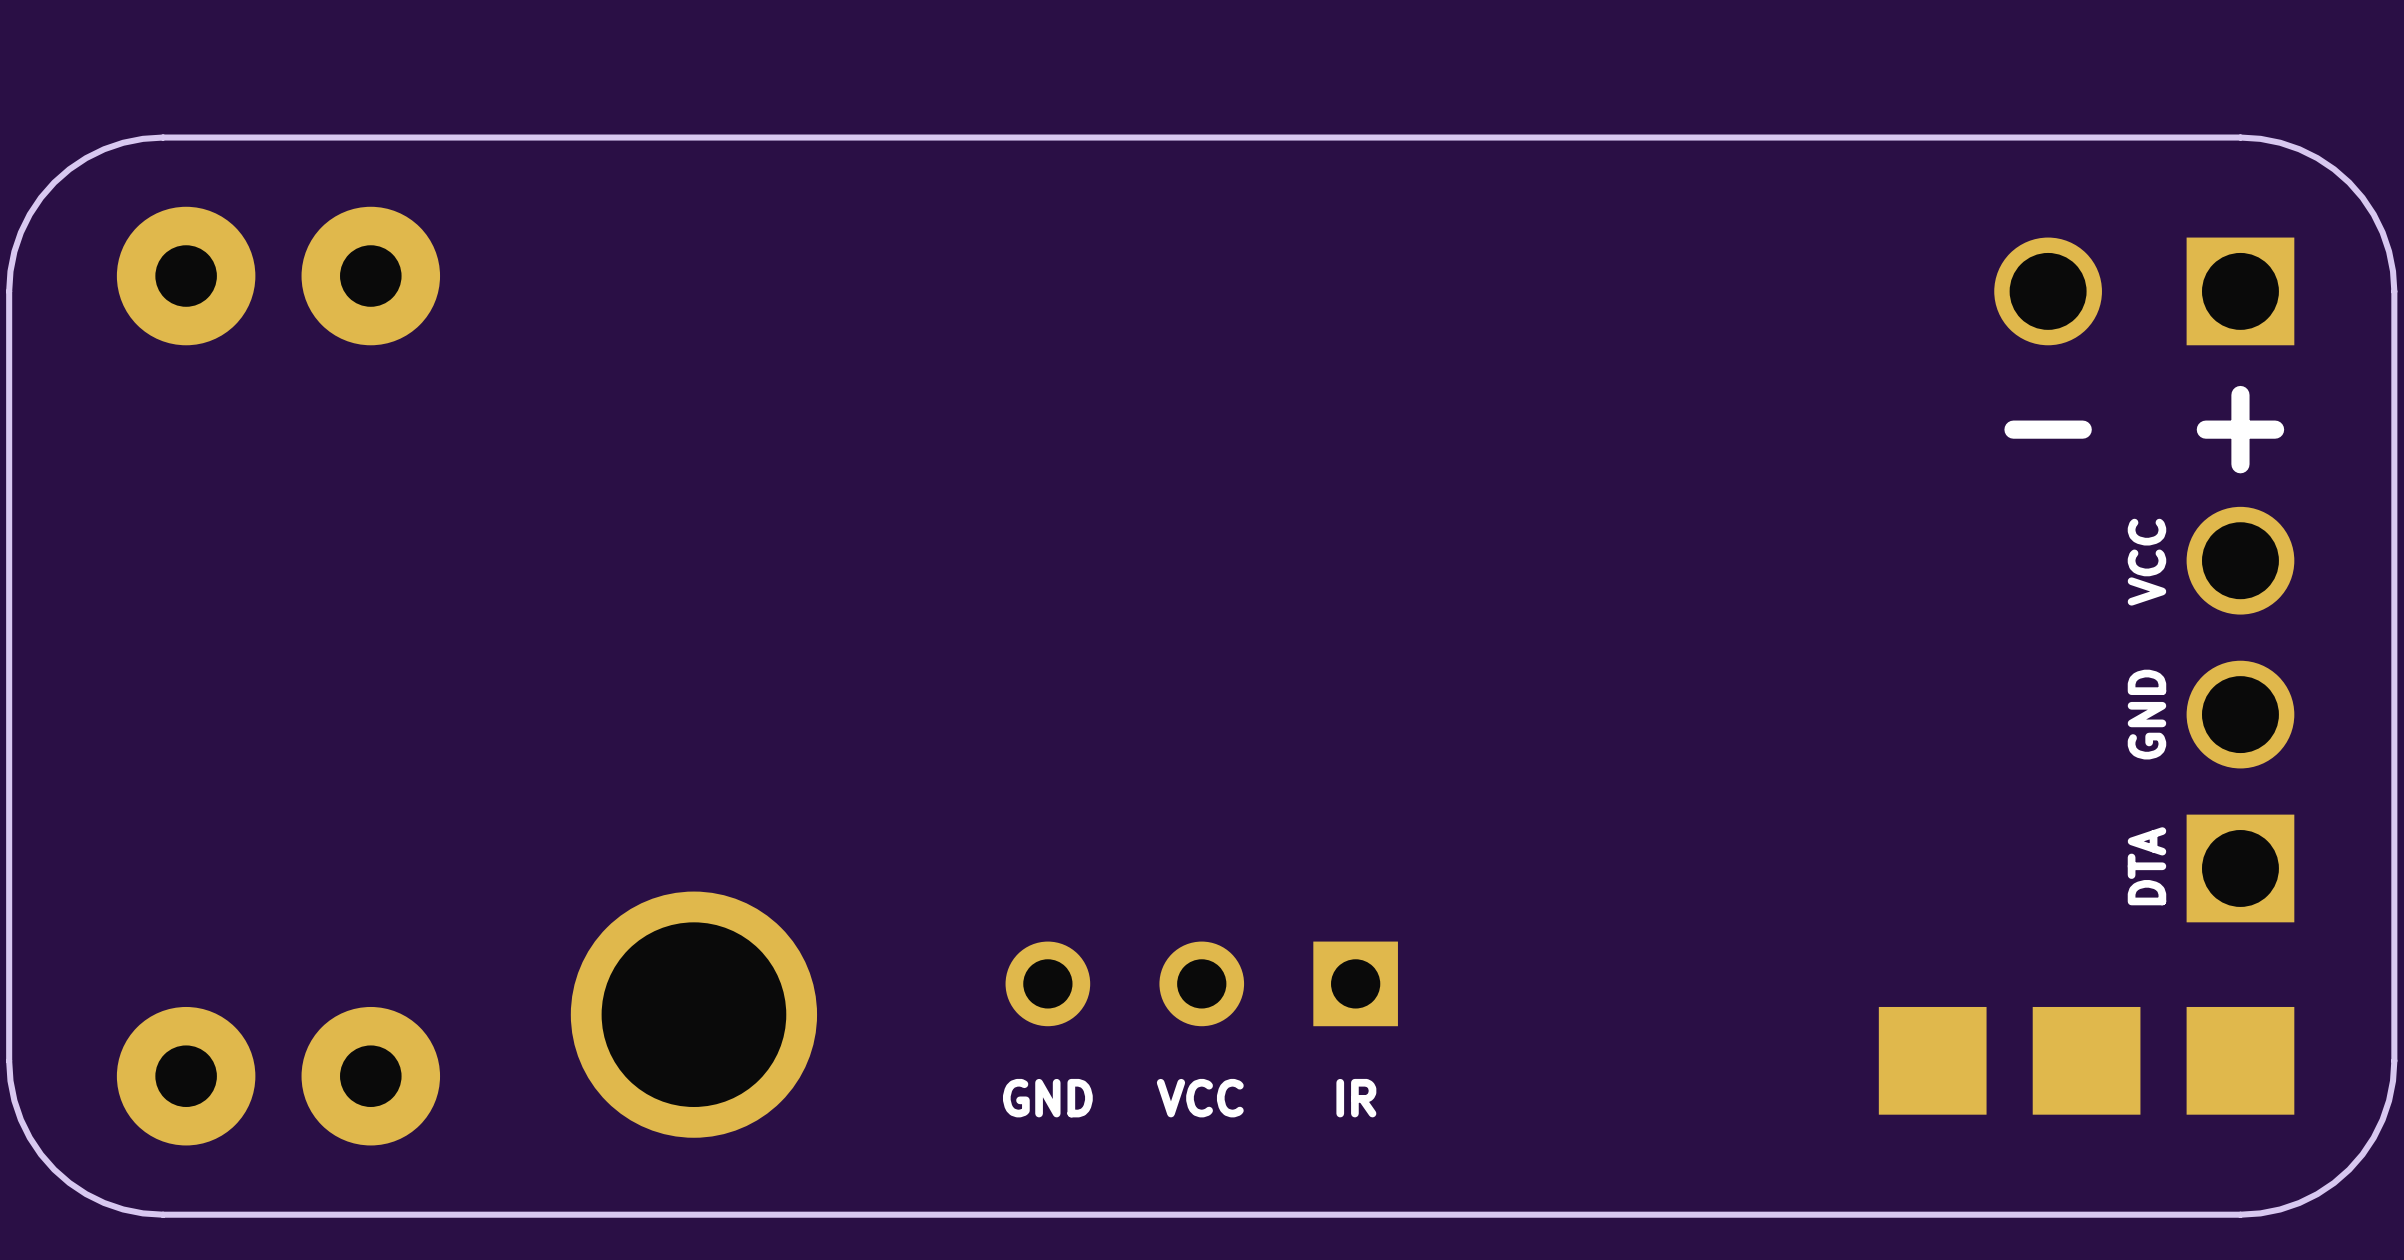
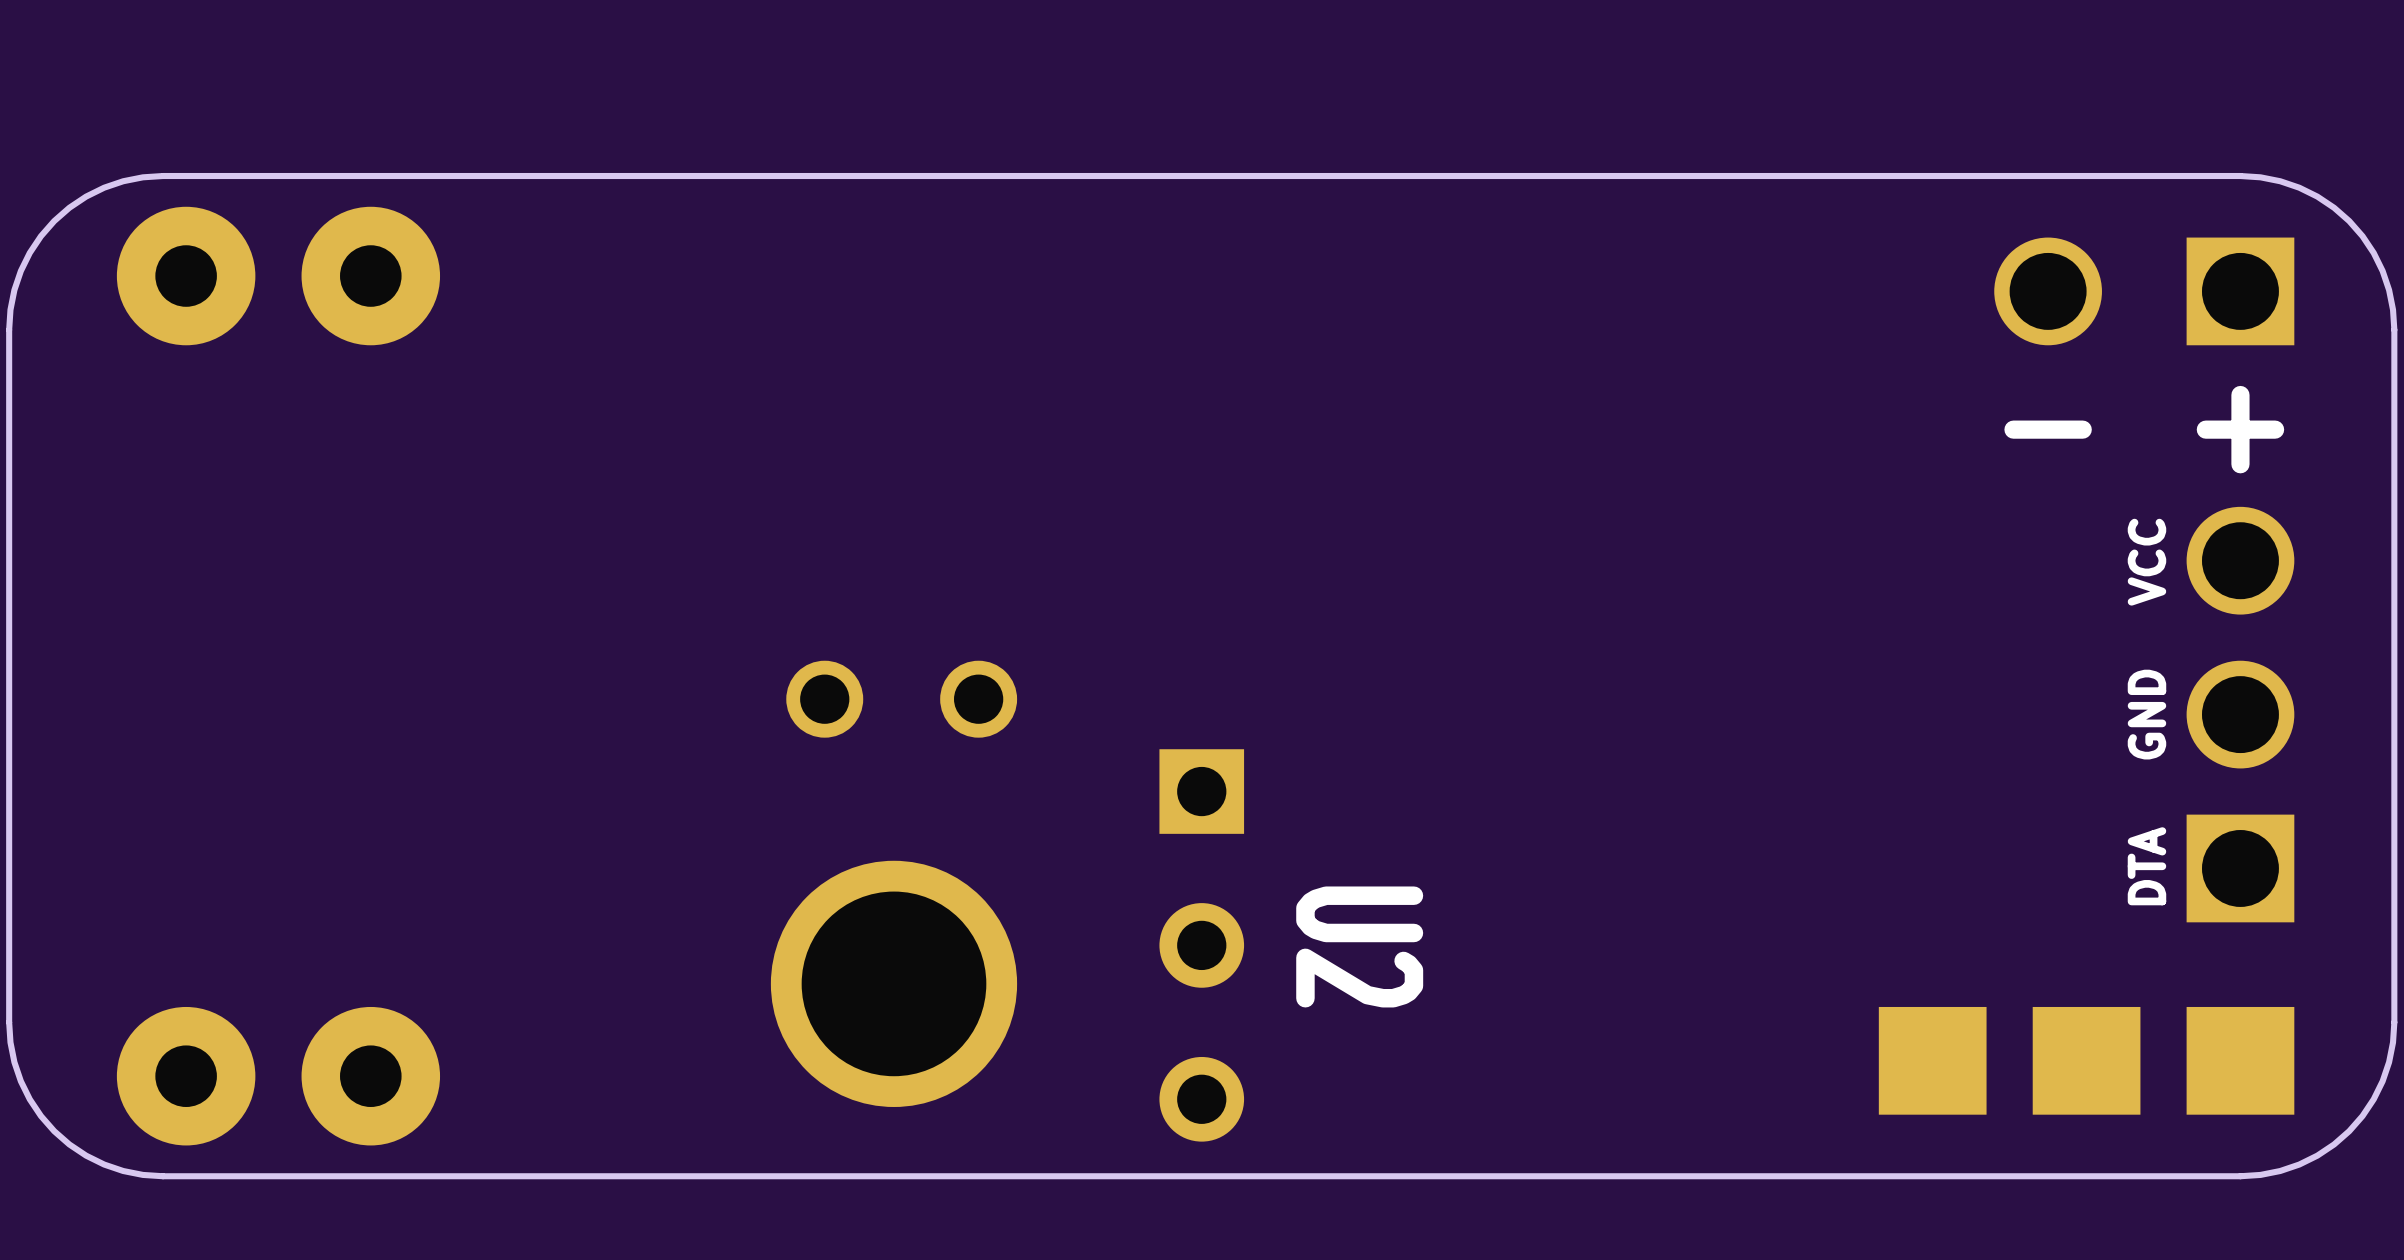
board edge: (2394, 329) (2393, 271) (2389, 251) (2373, 214) (2362, 197) (2349, 182) (2317, 158) (2280, 142) (2240, 137) (142, 138) (104, 149) (86, 158) (69, 169) (40, 197) (29, 214) (14, 251) (10, 271) (9, 329) -> (2394, 329) (2393, 309) (2382, 271) (2373, 252) (2349, 221) (2334, 207) (2299, 187) (2260, 177) (163, 176) (123, 181) (104, 187) (86, 196) (54, 221) (40, 236) (20, 271) (14, 290) (9, 329)
part: none -> (901, 699)
U2: none -> (1201, 945)
part: (1201, 983) -> none
part position: (693, 1014) -> (893, 983)
board edge: (9, 1022) (10, 1080) (14, 1100) (29, 1137) (40, 1154) (54, 1169) (86, 1194) (123, 1209) (163, 1214) -> none
board edge: (2394, 1022) (2393, 1080) (2389, 1100) (2373, 1137) (2362, 1154) (2334, 1182) (2317, 1194) (2299, 1203) (2260, 1213) (163, 1214) -> (2394, 1022) (2393, 1042) (2382, 1081) (2362, 1116) (2349, 1131) (2334, 1144) (2299, 1164) (2260, 1174) (2240, 1176) (142, 1174) (123, 1170) (86, 1155) (54, 1131) (29, 1099) (20, 1081) (14, 1062) (9, 1022)
text: GND (1047, 1098) -> none
text: VCC (1200, 1098) -> none
text: IR (1356, 1098) -> none

